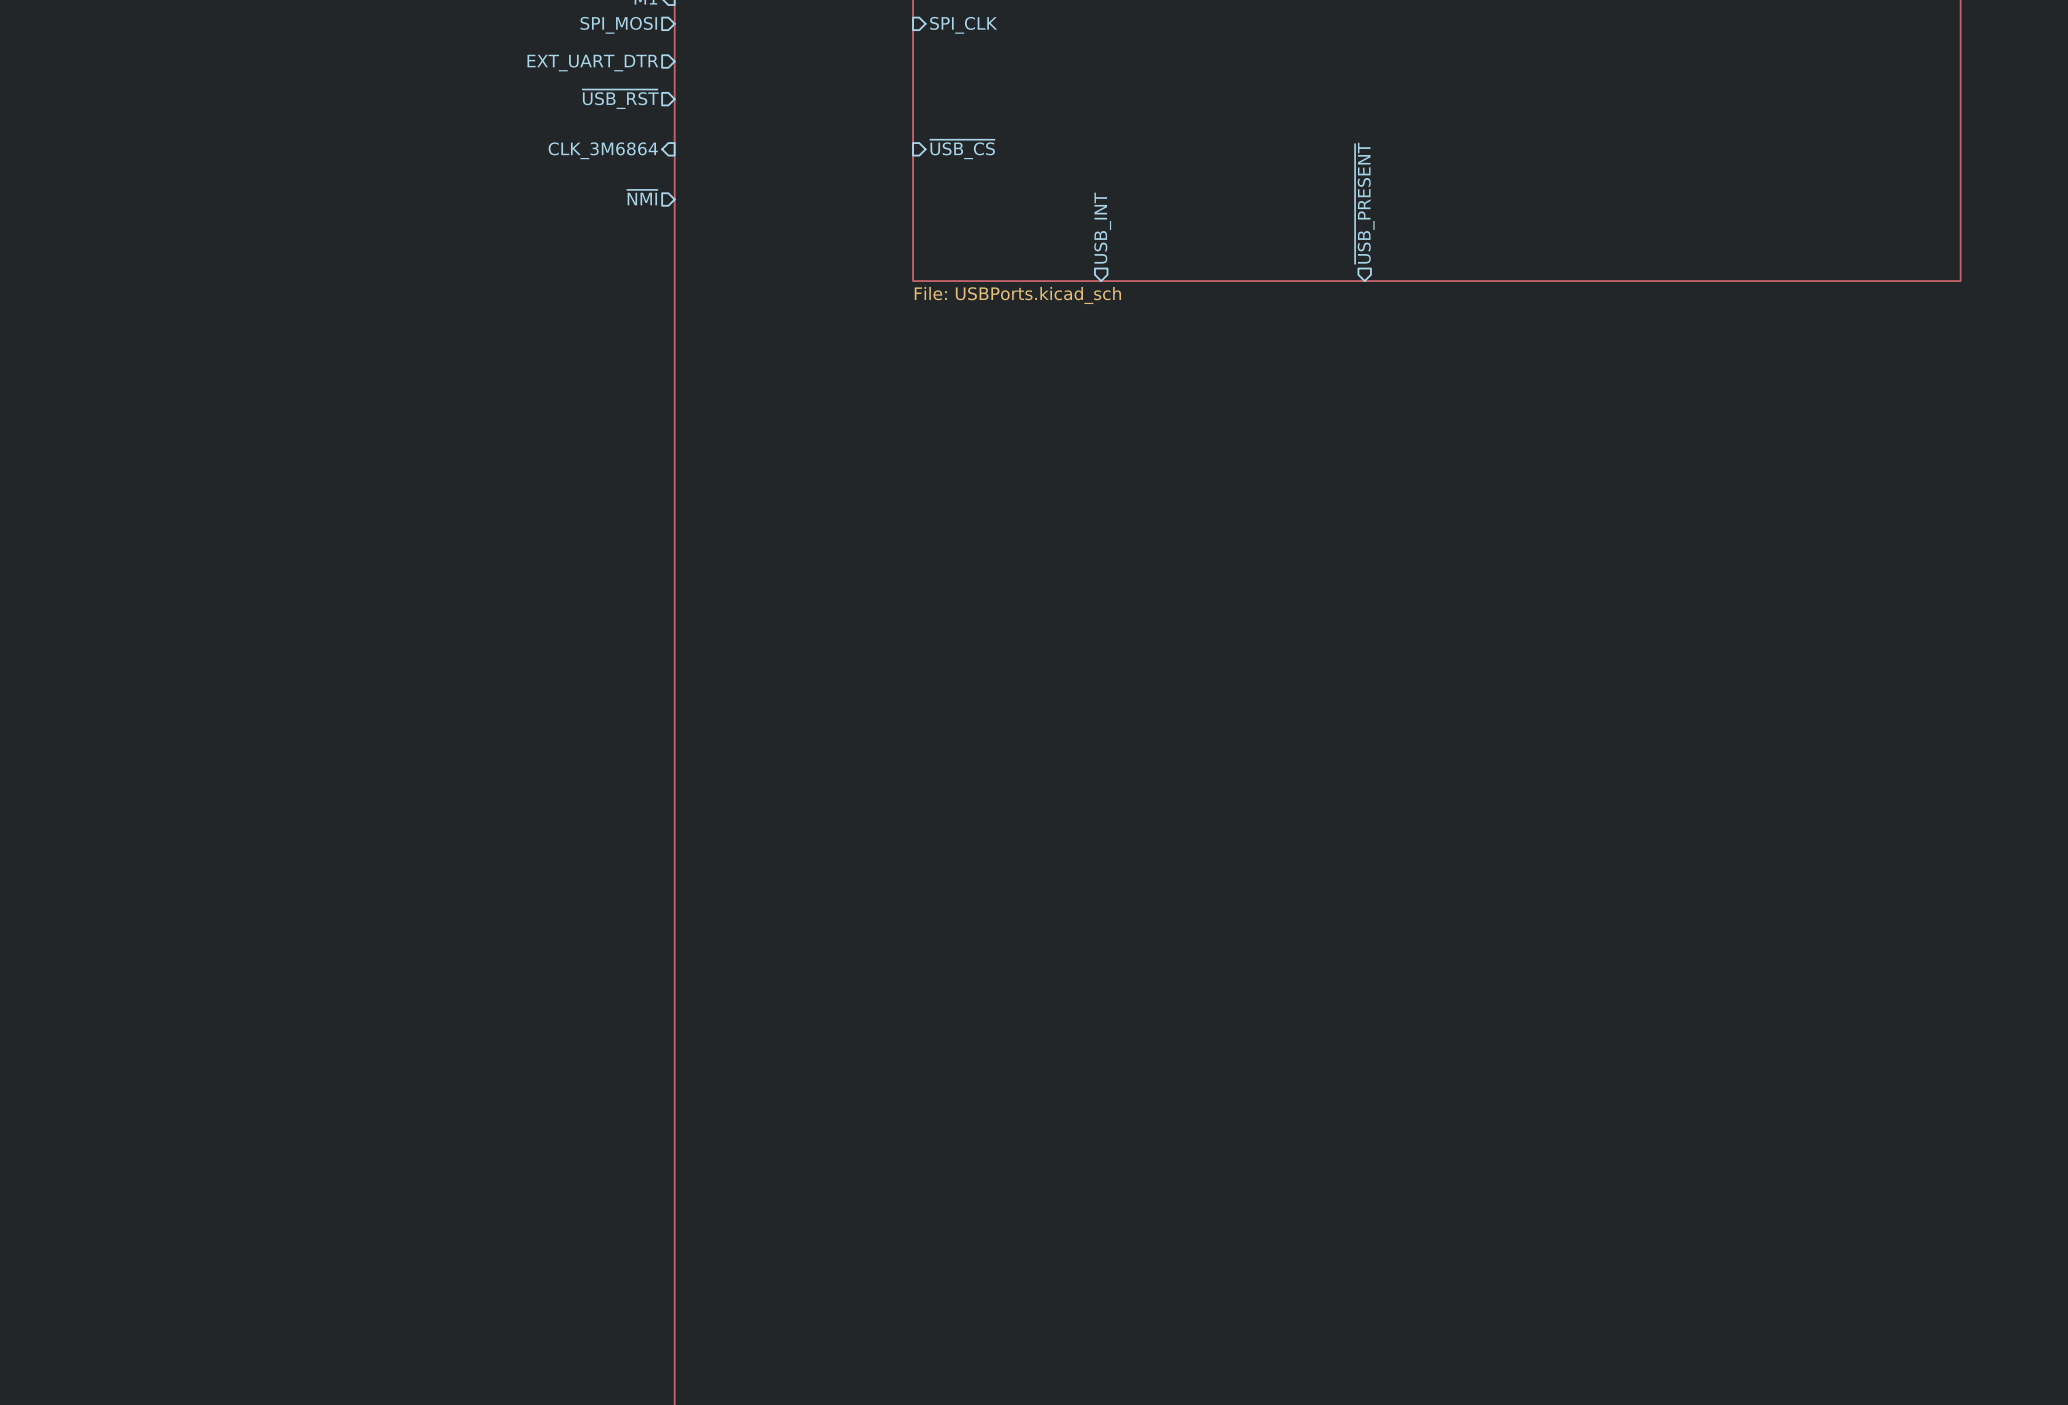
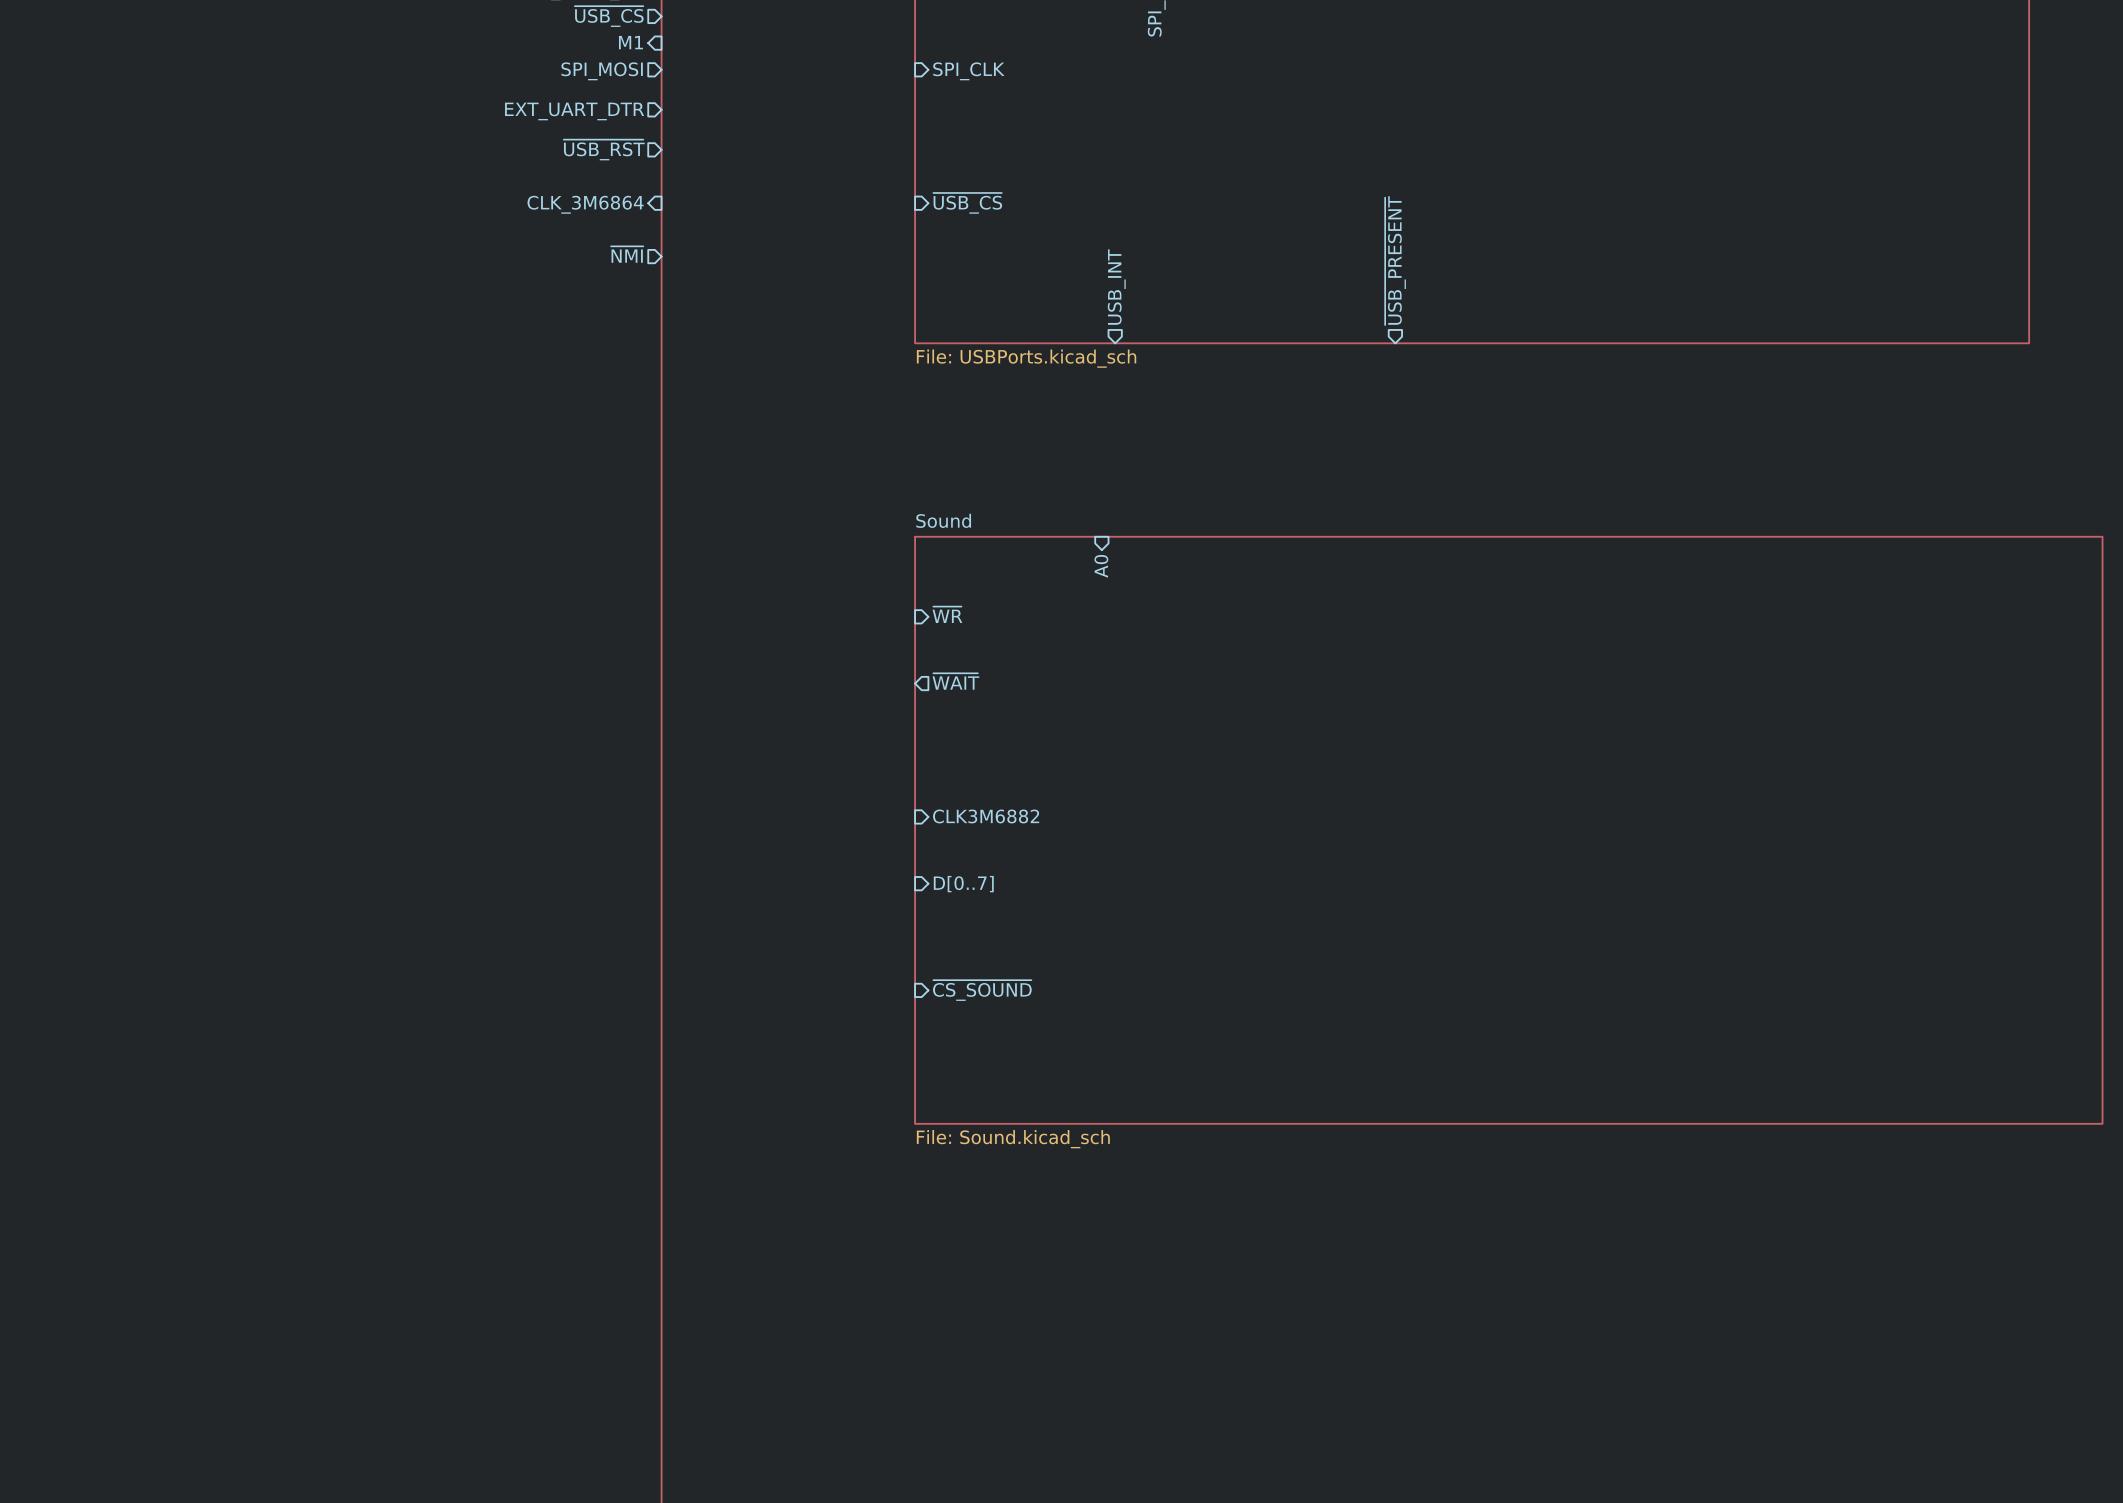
sheet pin: none -> A0 (1101, 566)
sheet pin: none -> ~{WR} (947, 614)
sheet pin: none -> ~{WAIT} (955, 681)
sheet pin: none -> CLK3M6882 (986, 816)
sheet Sound: none -> File: Sound.kicad_sch (1508, 830)
sheet pin: none -> D[0..7] (963, 884)
sheet pin: none -> ~{CS_SOUND} (982, 990)

